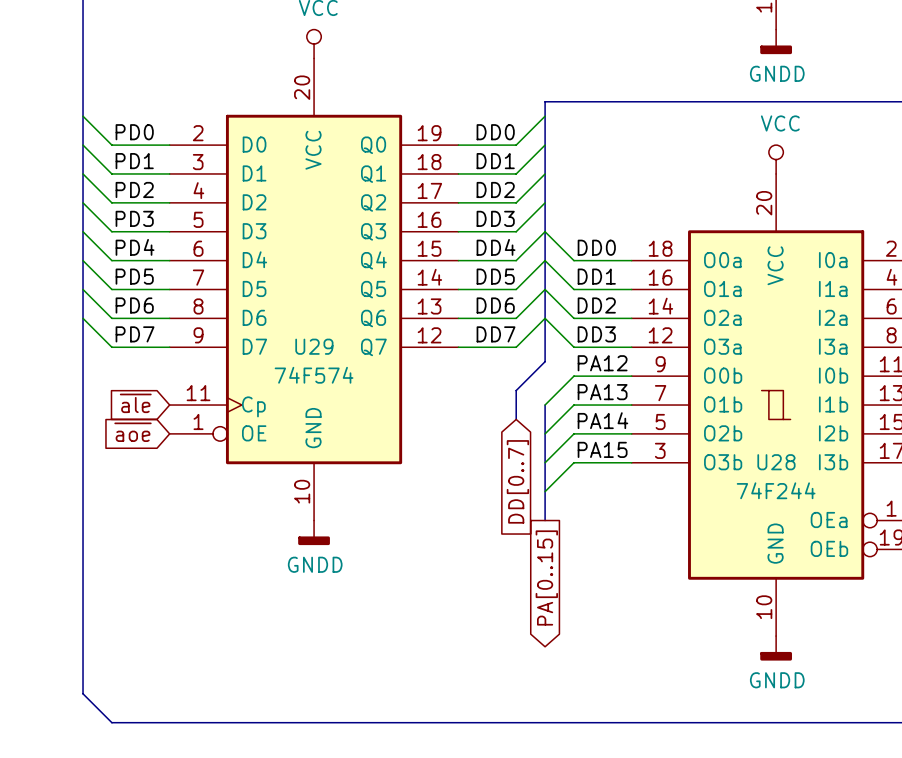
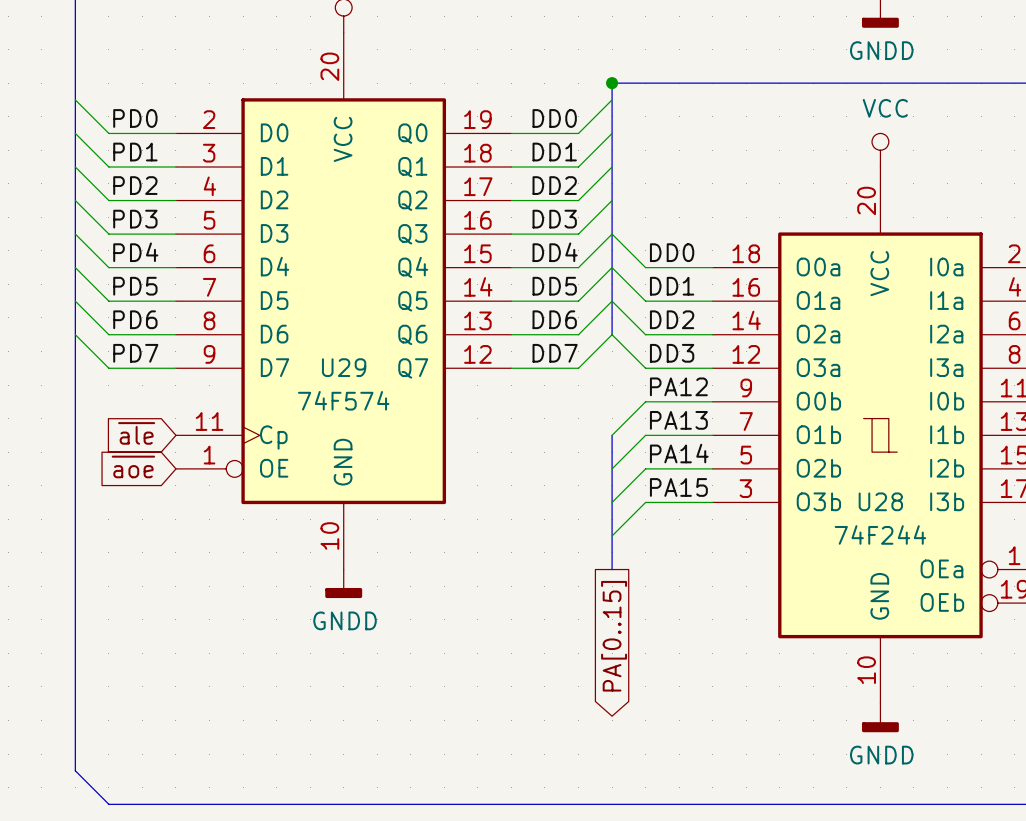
junction: none -> (612, 83)
bus: (545, 318) (545, 361) (516, 390) (516, 419) -> none
global label: DD[0..7] (517, 481) -> none

